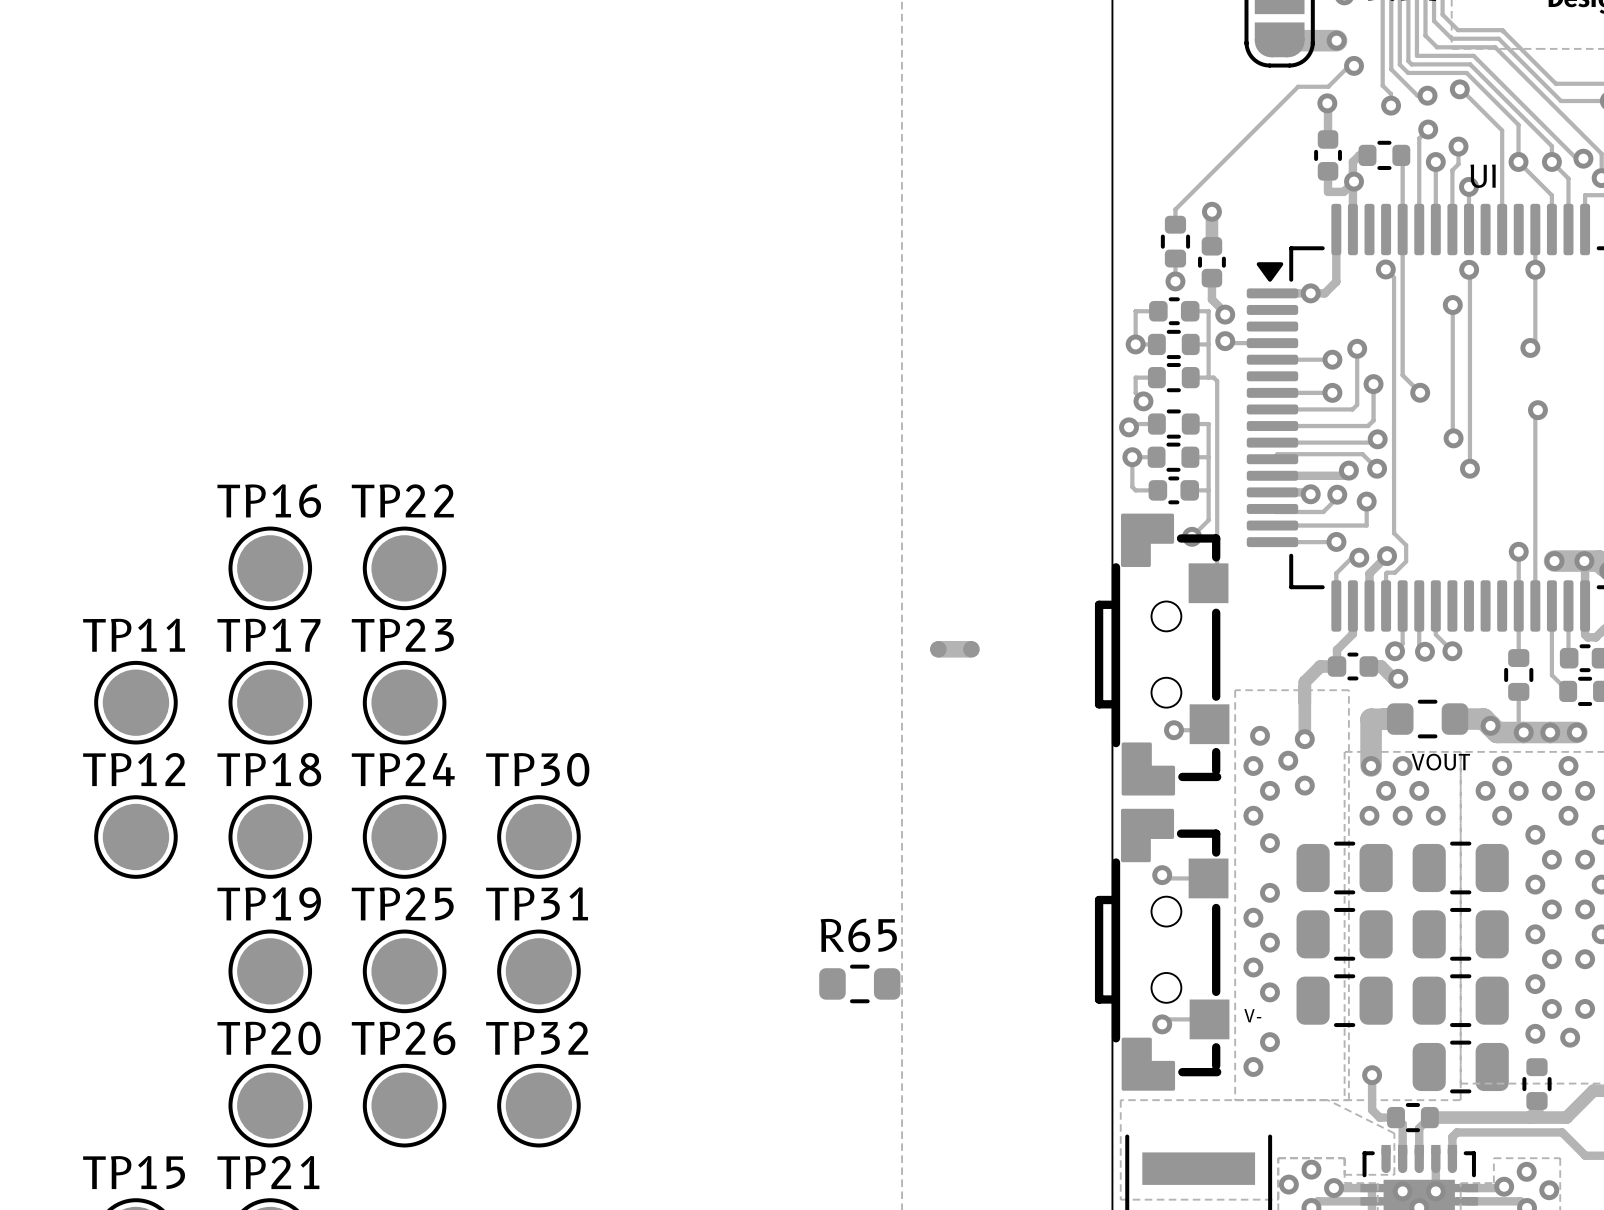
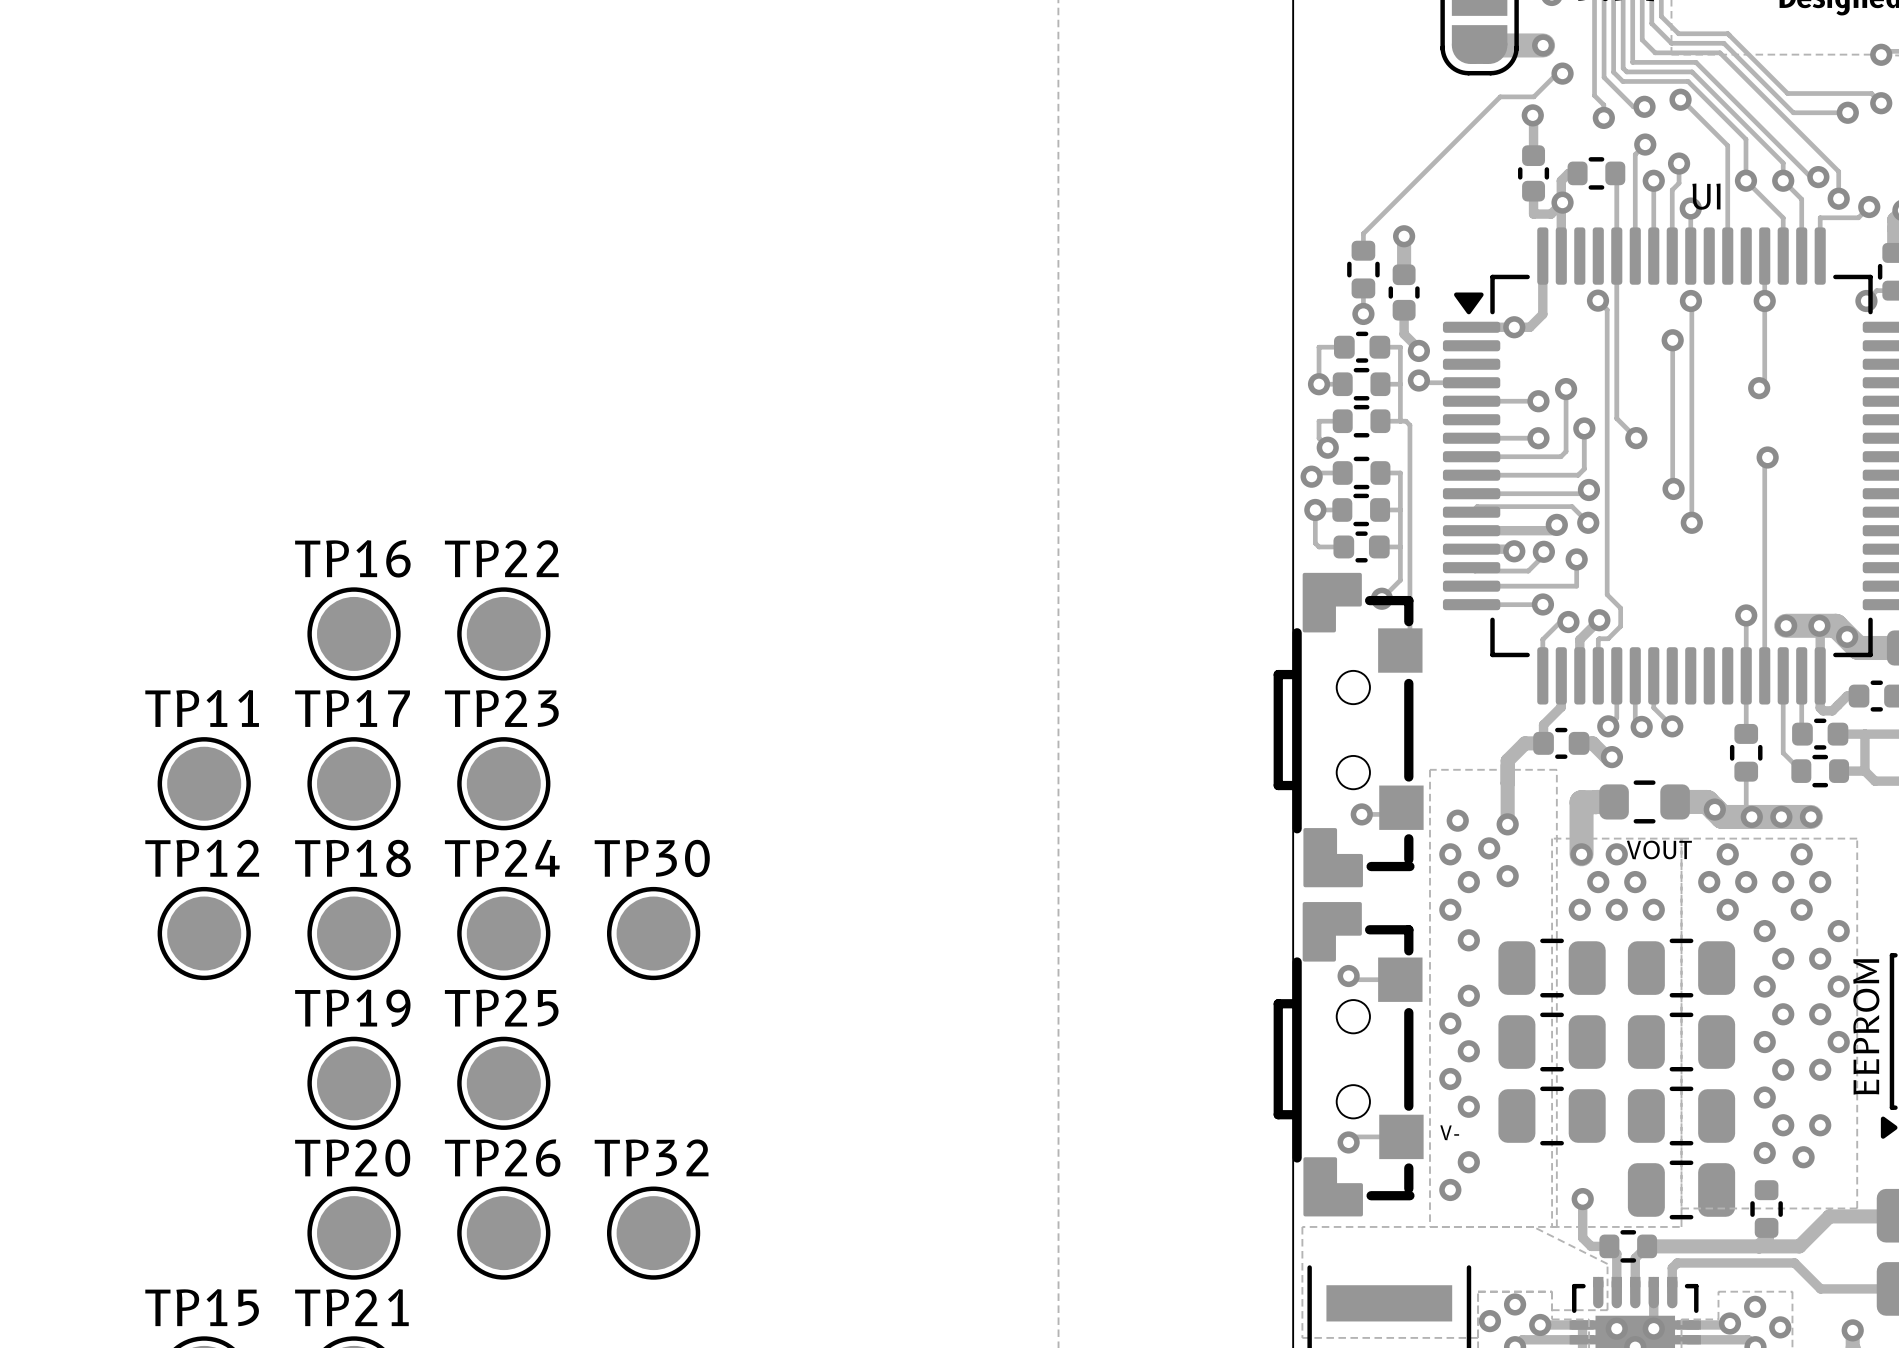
part: (954, 649) -> none
TP31: (538, 971) -> none
R65: (859, 983) -> none

